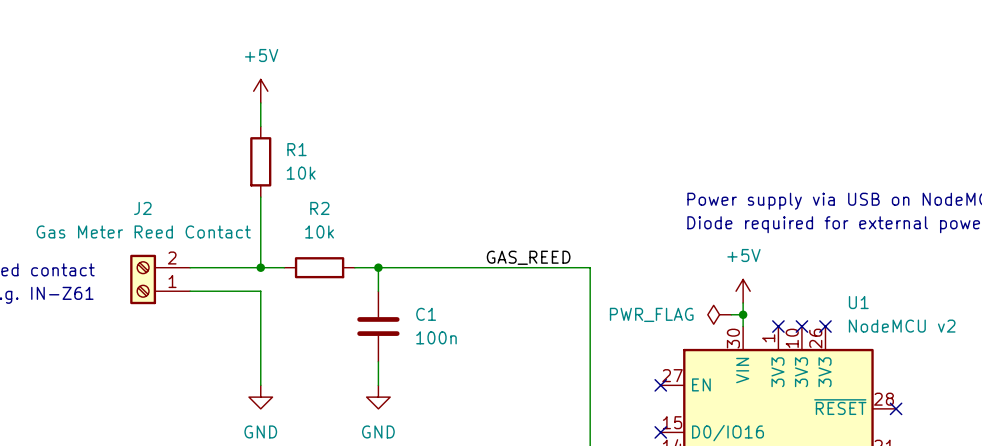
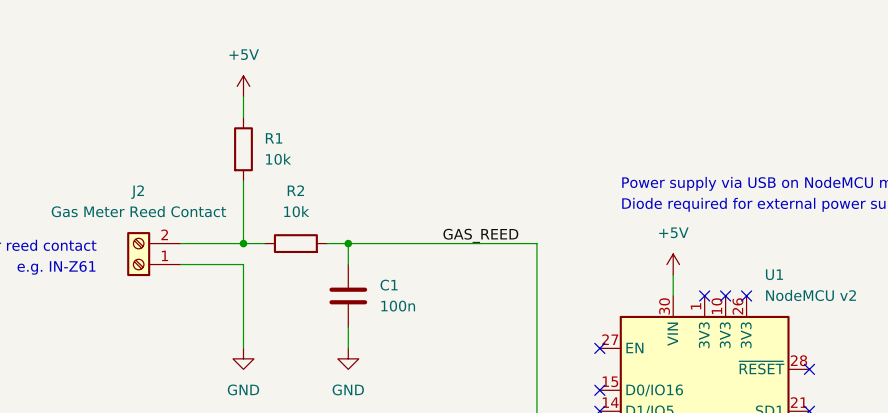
power symbol: PWR_FLAG (719, 314) -> none
wire: (731, 314) (743, 314) -> none
junction: (743, 314) -> none

